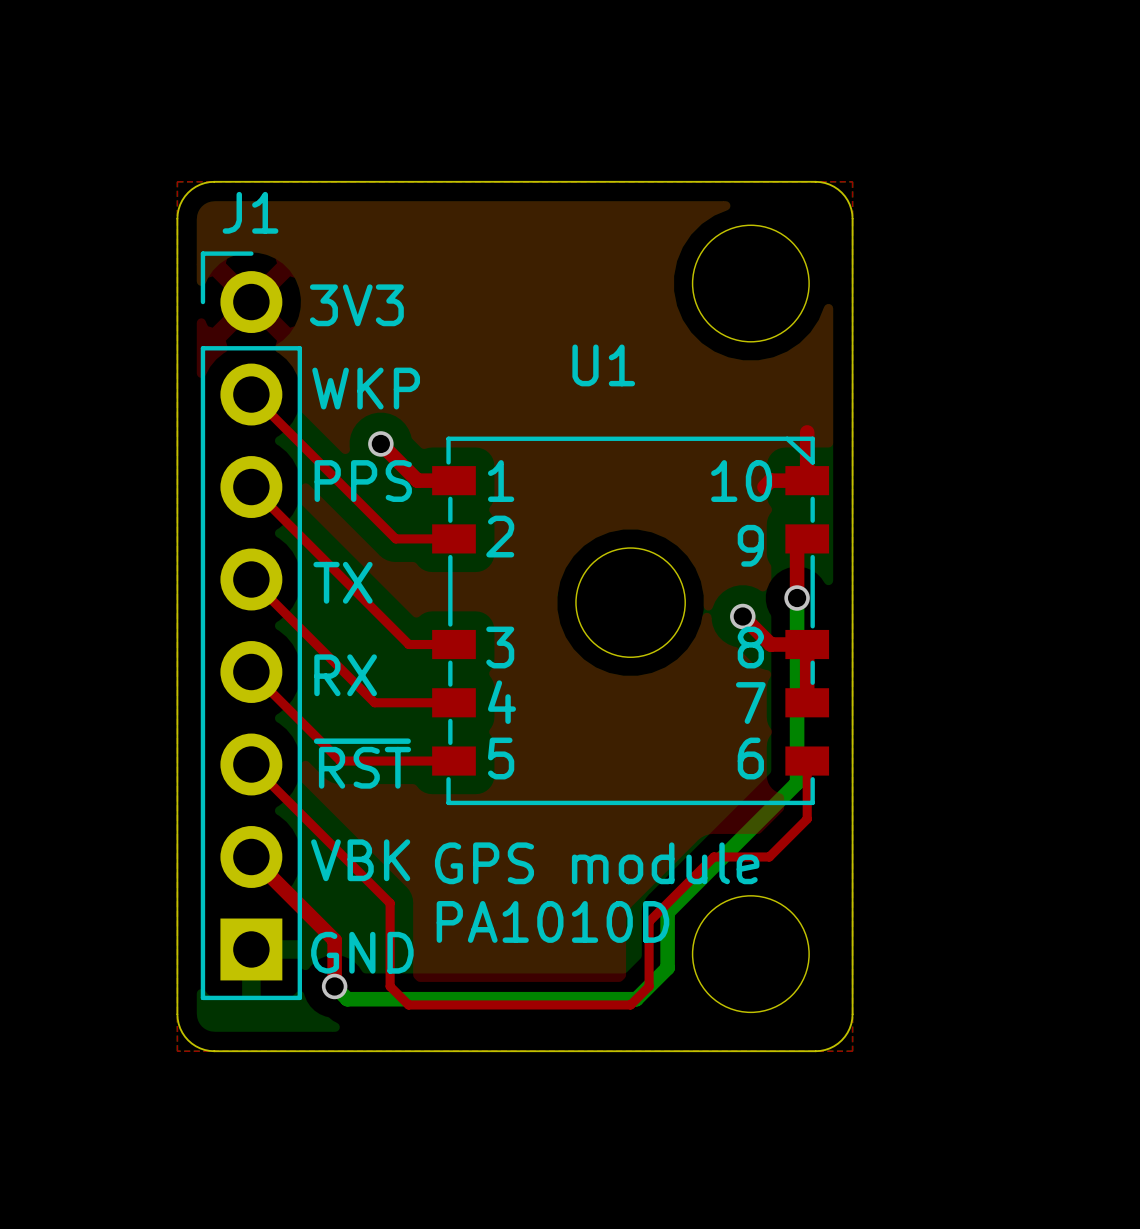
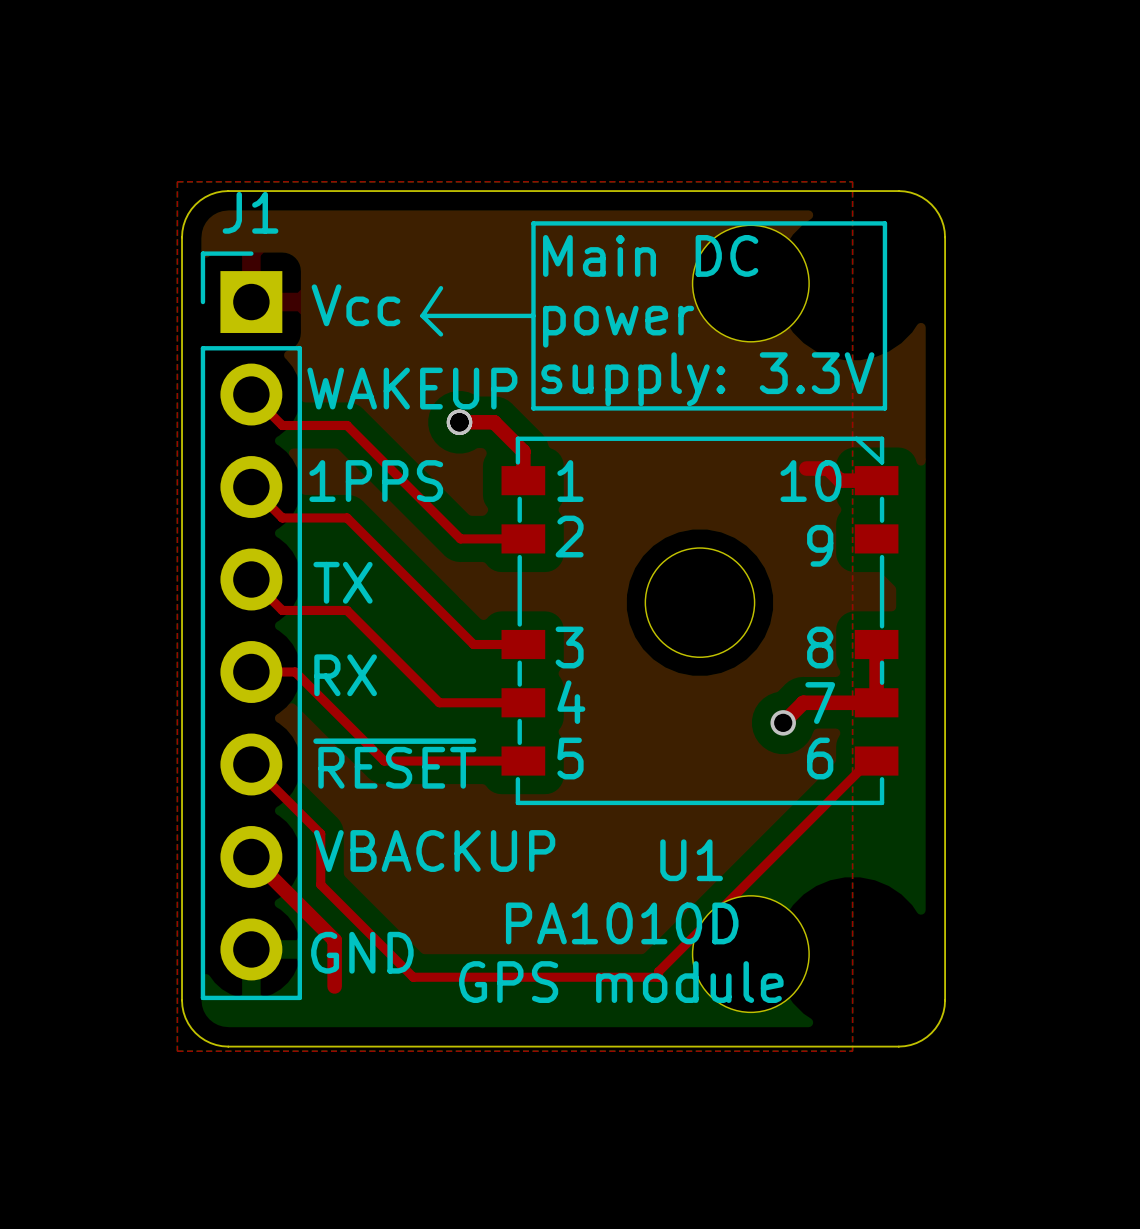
board edge: (214, 181) (815, 181) (834, 186) (844, 196) (849, 204) (852, 218) (852, 1014) (847, 1032) (838, 1043) (829, 1048) (815, 1051) (214, 1051) (195, 1046) (185, 1036) (180, 1028) (177, 1014) (177, 218) (180, 204) (188, 192) (200, 184) (214, 181) -> (228, 191) (210, 194) (195, 204) (185, 219) (182, 237) (182, 1000) (183, 1012) (191, 1028) (205, 1040) (216, 1045) (228, 1046) (898, 1046) (910, 1045) (926, 1037) (938, 1023) (943, 1012) (945, 1000) (945, 237) (943, 225) (935, 209) (921, 197) (910, 192) (898, 191) (228, 191)
line: none -> (533, 223) (533, 408) (884, 408) (884, 223) (533, 223)
J1 footprint: [200, 251, 303, 1001] -> [200, 251, 303, 1001]
text: none -> Main DC (650, 255)
line: none -> (440, 288) (422, 315)
text: 3V3 (356, 305) -> Vcc (356, 305)
line: none -> (422, 315) (440, 334)
line: none -> (422, 315) (533, 315)
text: none -> power (618, 326)
U1 name position: U1 (603, 365) -> U1 (691, 860)
text: none -> supply: 3.3V (707, 379)
text: WKP (366, 388) -> WAKEUP (412, 388)
top track: none -> (459, 422) (494, 422) (523, 451) (523, 480)
top track: (282, 425) (395, 538) (453, 538) -> (282, 425) (347, 425) (460, 538) (523, 538)
top track: (807, 432) (807, 480) (770, 480) (764, 487) -> none
top track: (380, 443) (417, 480) (453, 480) -> none
via position: (380, 443) -> (459, 422)
top track: none -> (806, 468) (828, 468) (840, 480) (876, 480)
text: PPS (363, 481) -> 1PPS (376, 481)
top track: (282, 517) (408, 644) (453, 644) -> (282, 517) (347, 517) (473, 644) (523, 644)
top track: (807, 538) (797, 549) (797, 598) -> none
bottom track: (797, 598) (797, 782) (667, 912) (667, 967) (636, 999) (347, 999) (334, 986) -> none
via: (797, 598) -> none
top track: (282, 610) (374, 702) (439, 702) -> (282, 610) (347, 610) (439, 702)
top track: (742, 616) (770, 644) (807, 644) (807, 702) -> none
via: (742, 616) -> none
U1 position: (630, 620) -> (699, 620)
top track: none -> (883, 644) (876, 644) (876, 702) (803, 702) (783, 722)
top track: (251, 672) (340, 761) (384, 761) -> (251, 672) (295, 672) (384, 761)
top track: none -> (453, 702) (523, 702)
via: none -> (783, 722)
top track: none -> (453, 761) (523, 761)
top track: (807, 761) (807, 819) (769, 856) (713, 856) (649, 921) (649, 986) (630, 1004) (408, 1004) (390, 986) (390, 903) (320, 833) -> (876, 761) (869, 761) (658, 971) (658, 977) (413, 977) (320, 884) (320, 833)
text: ~{RST} (362, 763) -> ~{RESET} (394, 763)
text: none -> VBACKUP (434, 851)
text: VBK (360, 860) -> none
text position: GPS module (597, 863) -> GPS module (621, 982)
text position: PA1010D (552, 921) -> PA1010D (622, 923)
via: (334, 986) -> none

